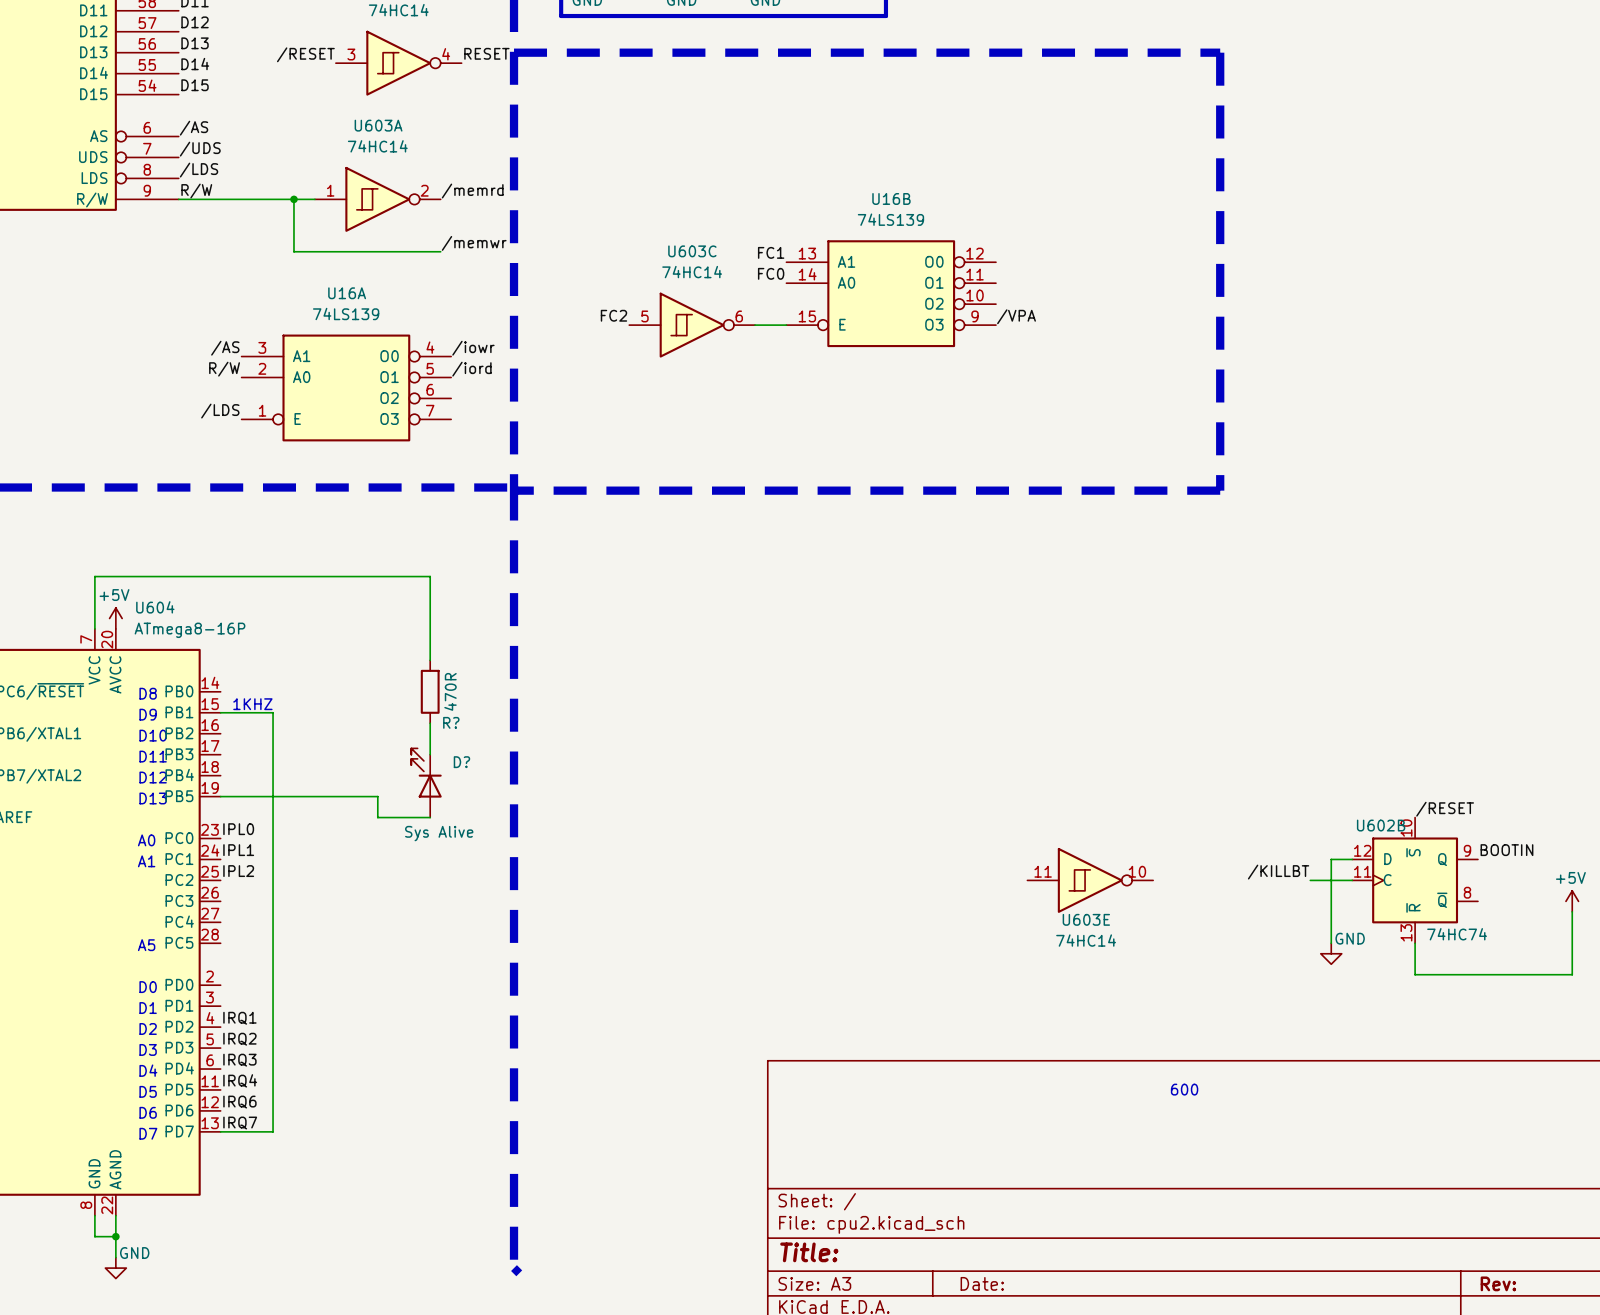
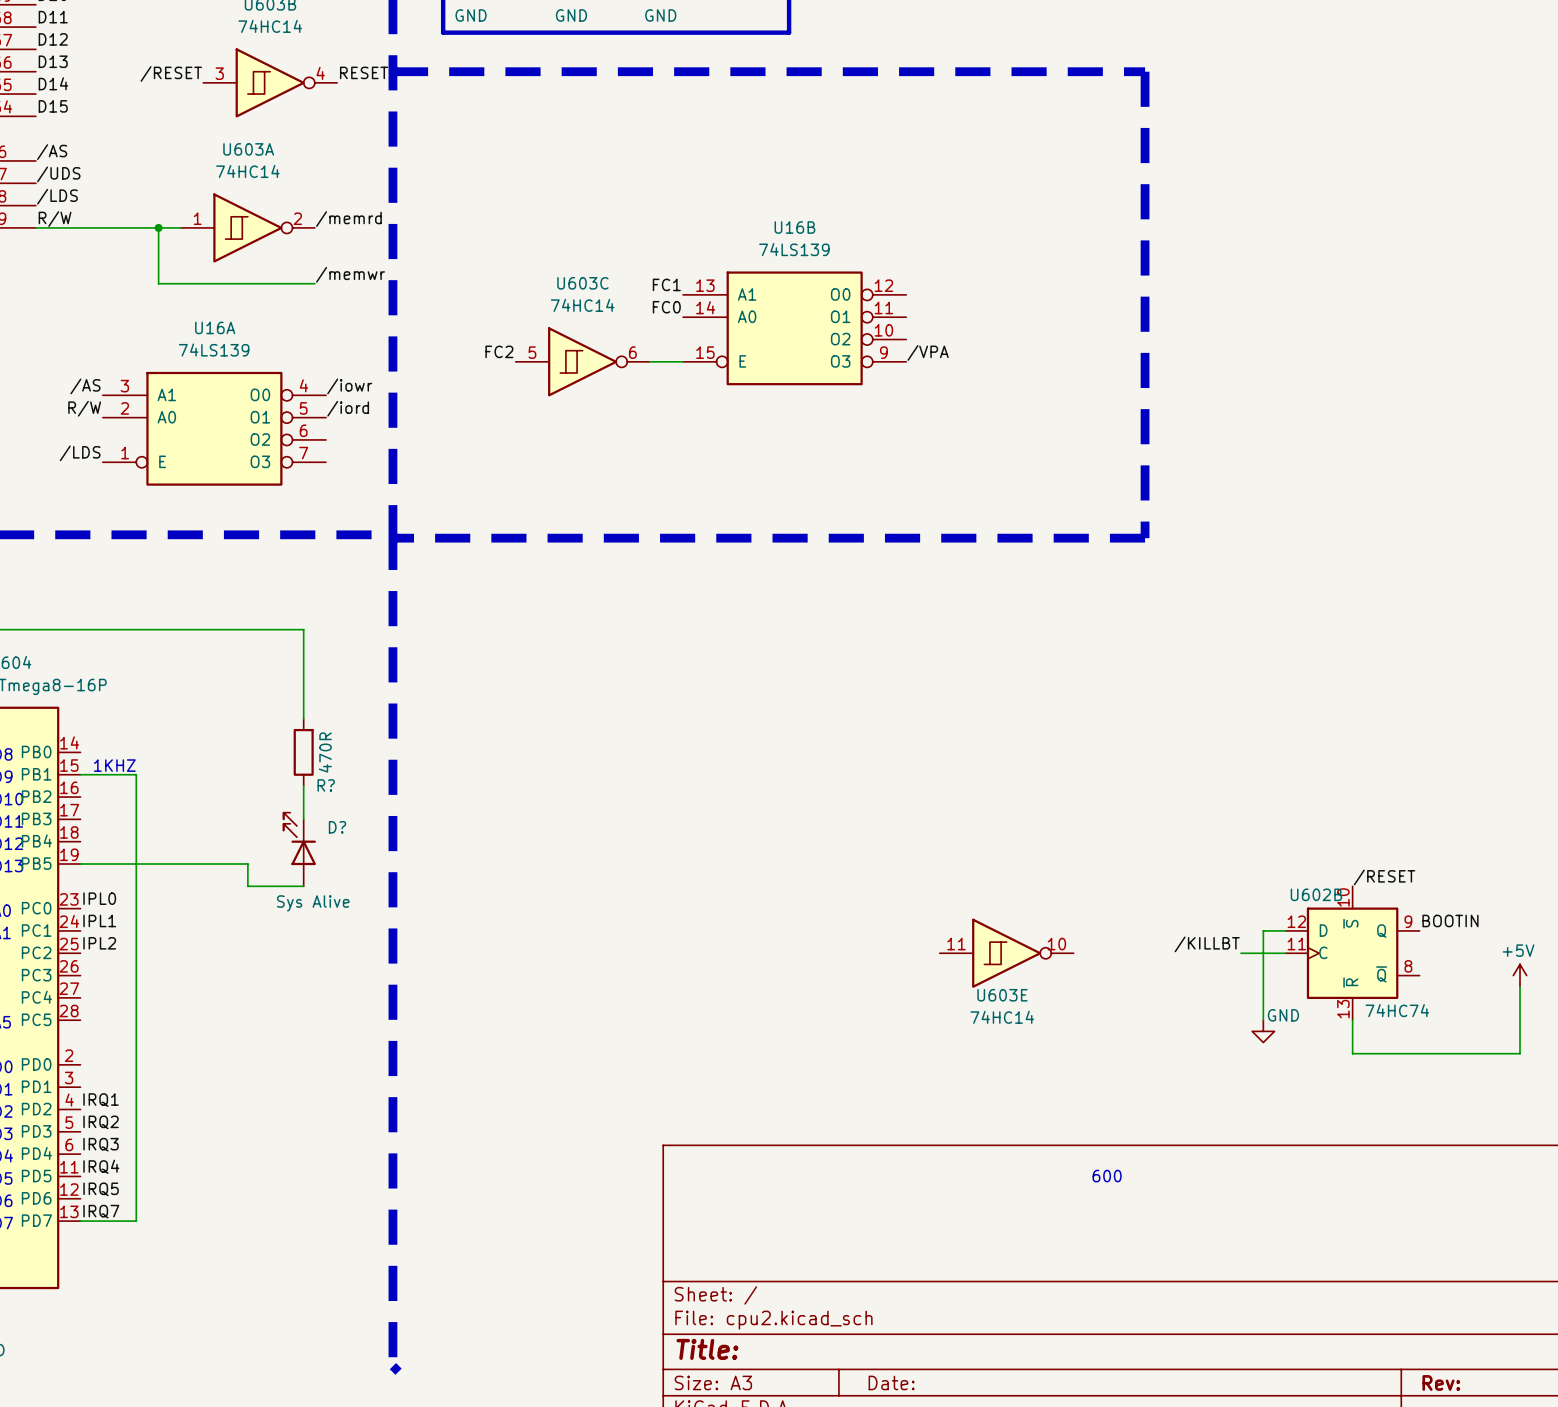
label: IRQ6 (239, 1102) -> IRQ5 (101, 1189)

